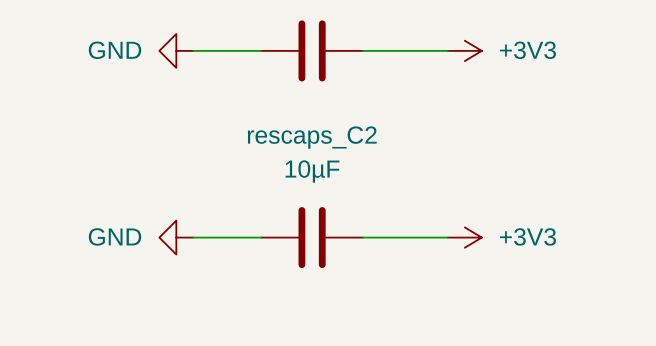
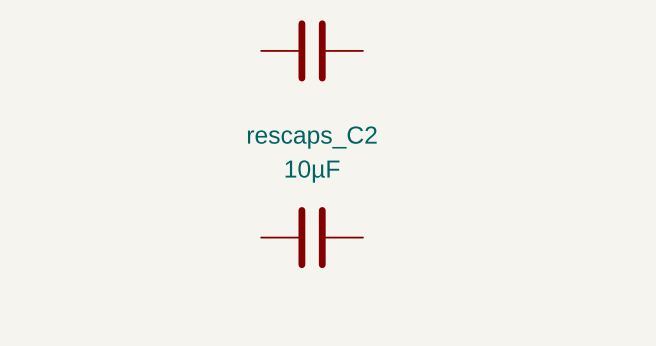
power symbol: GND (176, 50) -> none
wire: (193, 50) (261, 50) -> none
wire: (362, 50) (447, 50) -> none
power symbol: +3V3 (464, 50) -> none
power symbol: GND (176, 237) -> none
wire: (193, 237) (261, 237) -> none
wire: (362, 237) (447, 237) -> none
power symbol: +3V3 (464, 237) -> none

